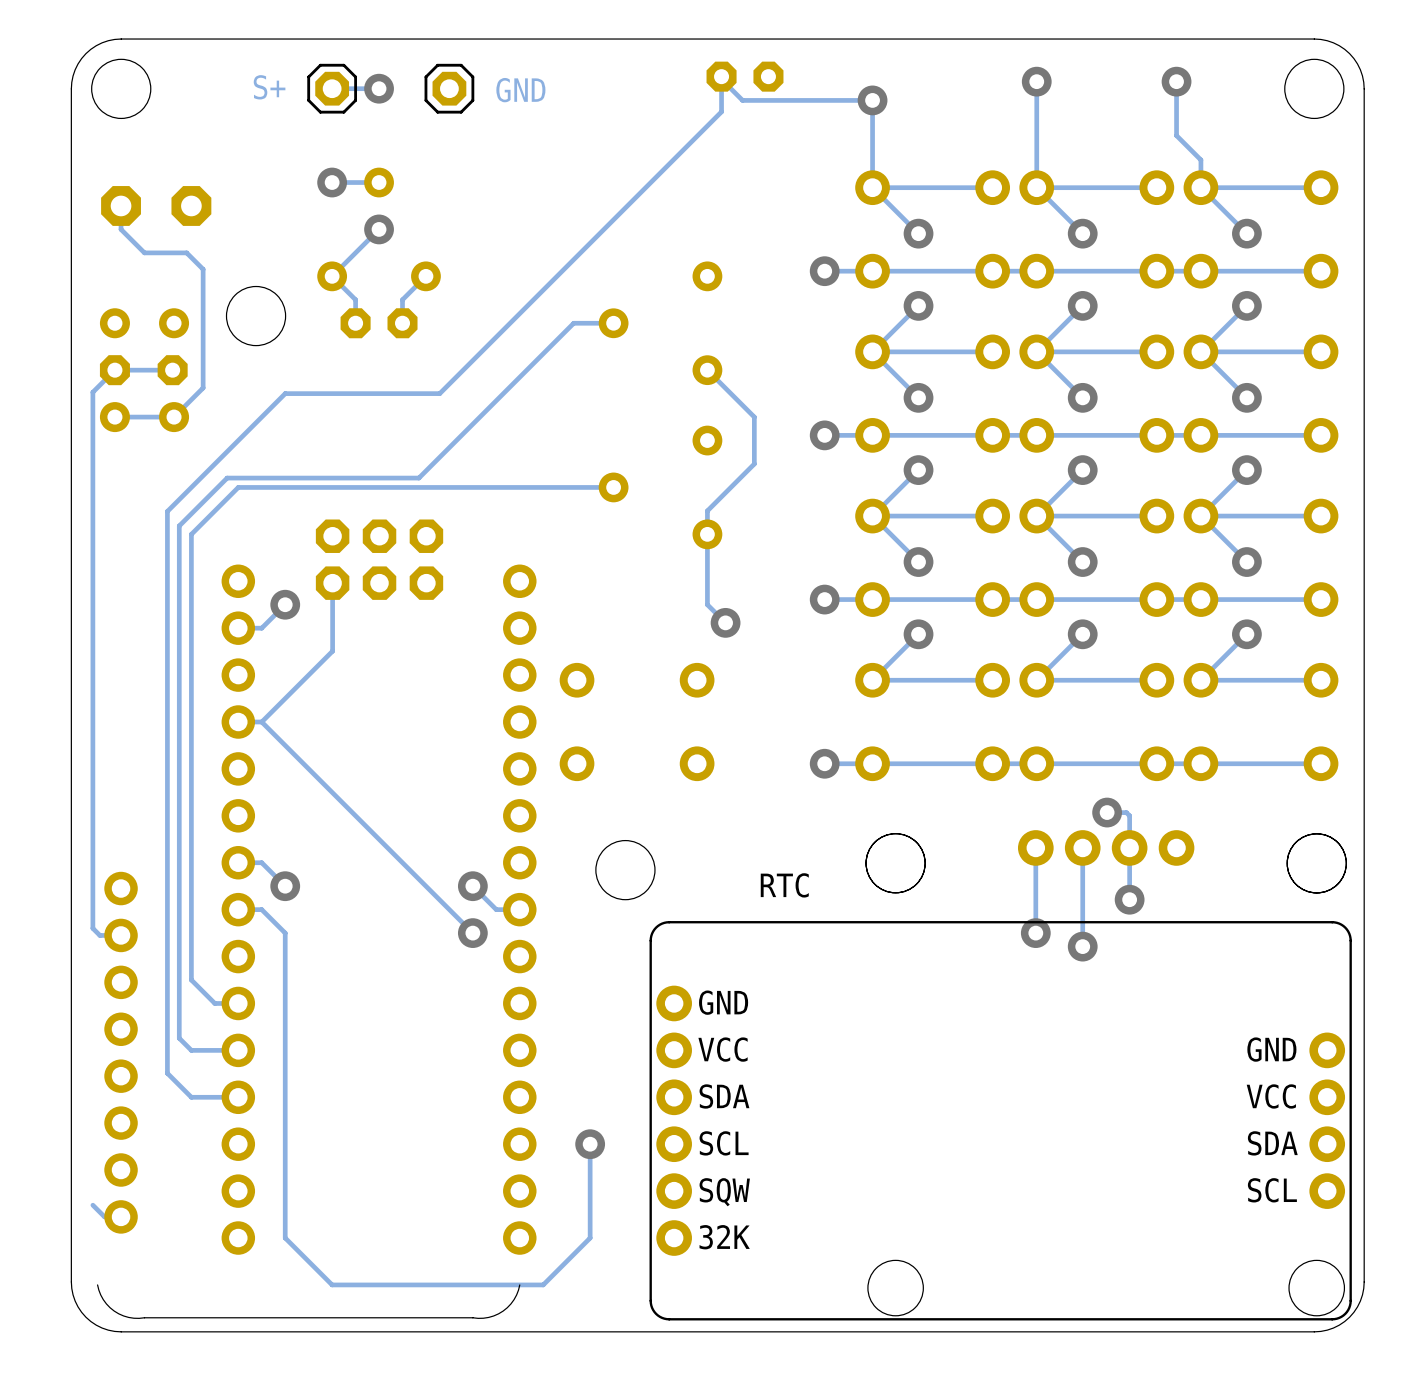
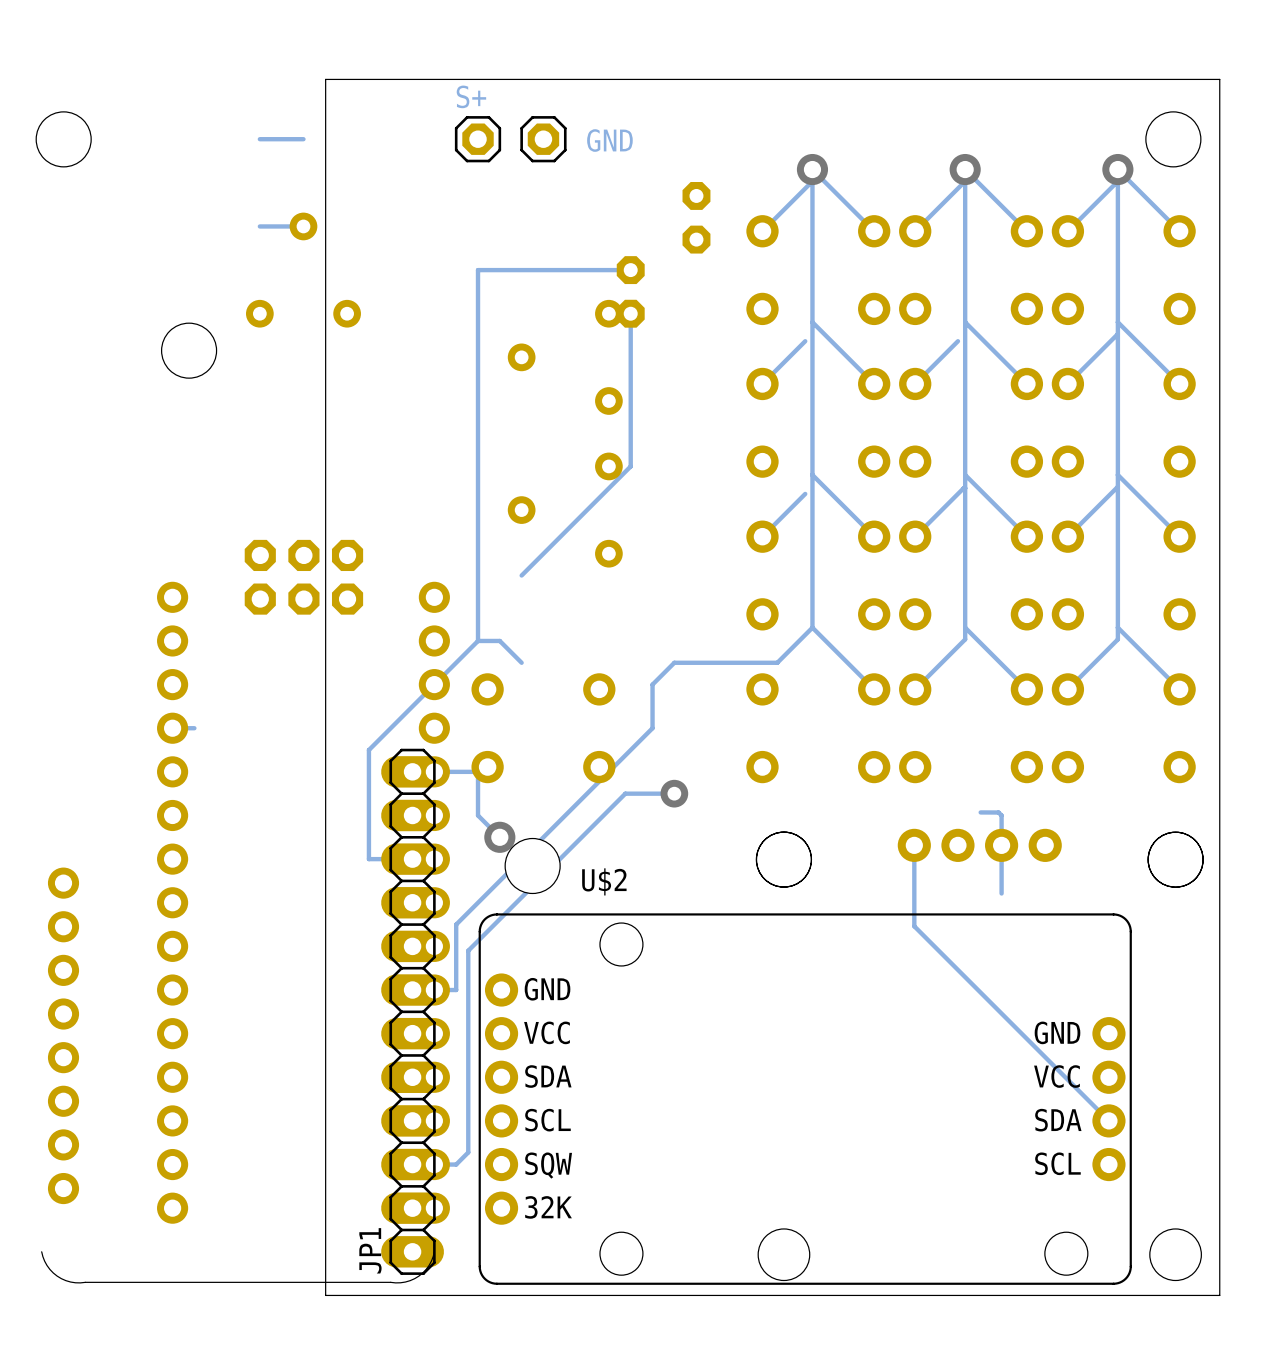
track: (721, 76) (721, 111) (439, 393) (285, 393) (167, 511) (167, 1073) (191, 1097) (238, 1097) -> none
part: (745, 76) -> none
track: (721, 79) (742, 100) (872, 100) (872, 187) -> none
track: (1036, 81) (1036, 187) -> (965, 181) (915, 231)
via: (1036, 81) -> none
track: (1176, 81) (1176, 135) (1200, 160) (1200, 187) -> none
via: (1176, 81) -> none
S+ name position: S+ (269, 87) -> S+ (471, 96)
S+ position: (332, 88) -> (478, 139)
via: (379, 88) -> none
GND position: (449, 88) -> (543, 139)
board edge: (1364, 88) (1360, 69) (1349, 53) (1333, 42) (1314, 39) (121, 39) (108, 40) (96, 45) (81, 58) (75, 69) (71, 88) (71, 1281) (73, 1294) (81, 1312) (90, 1321) (102, 1328) (114, 1331) (402, 1331) -> (1219, 139) (1219, 79) (325, 79) (325, 1295)
via: (872, 100) -> none
via: none -> (812, 169)
via: none -> (965, 169)
via: none -> (1117, 169)
part: none -> (696, 217)
via: (332, 182) -> none
track: (872, 187) (918, 233) -> none
track: (992, 187) (872, 187) -> (812, 181) (762, 231)
track: none -> (874, 231) (812, 169) (812, 627)
track: (1036, 187) (1082, 233) -> none
track: (1156, 187) (1036, 187) -> (1026, 231) (965, 169) (965, 639) (957, 646)
track: (1200, 187) (1246, 233) -> none
track: (1321, 187) (1200, 187) -> (1117, 181) (1067, 231)
track: none -> (1179, 231) (1117, 169) (1117, 639) (1110, 646)
track: (121, 205) (121, 229) (144, 252) (186, 252) (203, 269) (203, 387) (174, 417) (114, 417) -> none
part: (121, 205) -> none
part: (191, 205) -> none
track: (379, 229) (332, 276) (355, 299) (355, 323) -> none
via: (379, 229) -> none
track: none -> (630, 270) (478, 270) (478, 640)
via: (918, 233) -> none
via: (1082, 233) -> none
via: (1246, 233) -> none
part: none -> (630, 291)
via: (824, 271) -> none
track: (1321, 271) (824, 271) -> none
track: (425, 276) (402, 299) (402, 323) -> none
track: none -> (630, 313) (630, 466) (521, 575)
track: none -> (1117, 334) (1110, 341)
via: (918, 305) -> none
via: (1082, 305) -> none
via: (1246, 305) -> none
part: (379, 323) -> none
track: (613, 323) (573, 323) (418, 478) (227, 478) (179, 525) (179, 1038) (191, 1050) (238, 1050) -> none
track: (992, 351) (872, 351) (918, 397) -> (874, 383) (812, 322)
track: (1156, 351) (1036, 351) (1082, 397) -> (1026, 383) (965, 322)
track: (1321, 351) (1200, 351) (1246, 397) -> (1179, 383) (1117, 322)
part: (144, 370) -> none
track: (172, 370) (114, 370) (92, 392) (92, 928) (99, 935) (121, 935) -> none
track: (707, 370) (754, 417) (754, 463) (707, 510) (707, 604) (725, 622) -> none
via: (918, 397) -> none
via: (1082, 397) -> none
via: (1246, 397) -> none
via: (824, 435) -> none
track: (1321, 435) (824, 435) -> none
track: none -> (1117, 486) (1110, 493)
track: none -> (965, 488) (957, 493)
via: (918, 470) -> none
via: (1082, 470) -> none
via: (1246, 470) -> none
track: (613, 487) (238, 487) (191, 534) (191, 980) (214, 1003) (238, 1003) -> none
track: (992, 516) (872, 516) (918, 562) -> (874, 536) (812, 474)
track: (1156, 516) (1036, 516) (1082, 562) -> (1026, 536) (965, 474)
track: (1321, 516) (1200, 516) (1246, 562) -> (1179, 536) (1117, 474)
via: (918, 562) -> none
via: (1082, 562) -> none
via: (1246, 562) -> none
track: (332, 583) (332, 651) (261, 722) (472, 933) -> none
via: (824, 599) -> none
track: (1321, 599) (824, 599) -> none
track: (285, 604) (261, 628) (238, 628) -> none
via: (285, 604) -> none
track: none -> (812, 627) (777, 662) (674, 662) (652, 684) (652, 728) (456, 924) (456, 990) (412, 990)
via: (725, 622) -> none
track: none -> (478, 640) (368, 750) (368, 859) (412, 859)
track: (918, 634) (872, 680) (992, 680) -> (812, 627) (874, 689)
via: (918, 634) -> none
via: (1082, 634) -> none
via: (1246, 634) -> none
track: (1156, 680) (1036, 680) -> (1026, 689) (965, 627)
track: (1321, 680) (1200, 680) -> (1179, 689) (1117, 627)
via position: (824, 763) -> (674, 793)
track: (1321, 763) (824, 763) -> none
track: none -> (412, 771) (478, 771) (478, 815) (499, 837)
track: none -> (674, 793) (625, 793) (468, 950) (468, 1152) (456, 1164) (412, 1164)
via: (1107, 812) -> none
via: none -> (499, 837)
track: (1082, 847) (1082, 946) -> none
track: (238, 862) (261, 862) (285, 886) -> (478, 640) (499, 640) (521, 662)
via: (285, 886) -> none
track: (472, 886) (496, 909) (519, 909) -> none
via: (472, 886) -> none
via: (1129, 899) -> none
track: (238, 909) (261, 909) (285, 933) (285, 1238) (332, 1284) (543, 1284) (590, 1238) (590, 1144) -> none
via: (472, 933) -> none
track: none -> (914, 924) (1108, 1120)
via: (1035, 933) -> none
via: (1082, 946) -> none
JP1: none -> (412, 1011)
U$2: none -> (805, 1099)
RTC: (1000, 1120) -> none
via: (590, 1144) -> none
track: (92, 1205) (104, 1216) (121, 1216) -> none
board edge: (1364, 1281) (1360, 1301) (1349, 1317) (1333, 1328) (1314, 1331) -> (1219, 1249) (1219, 1295) (1173, 1295)

